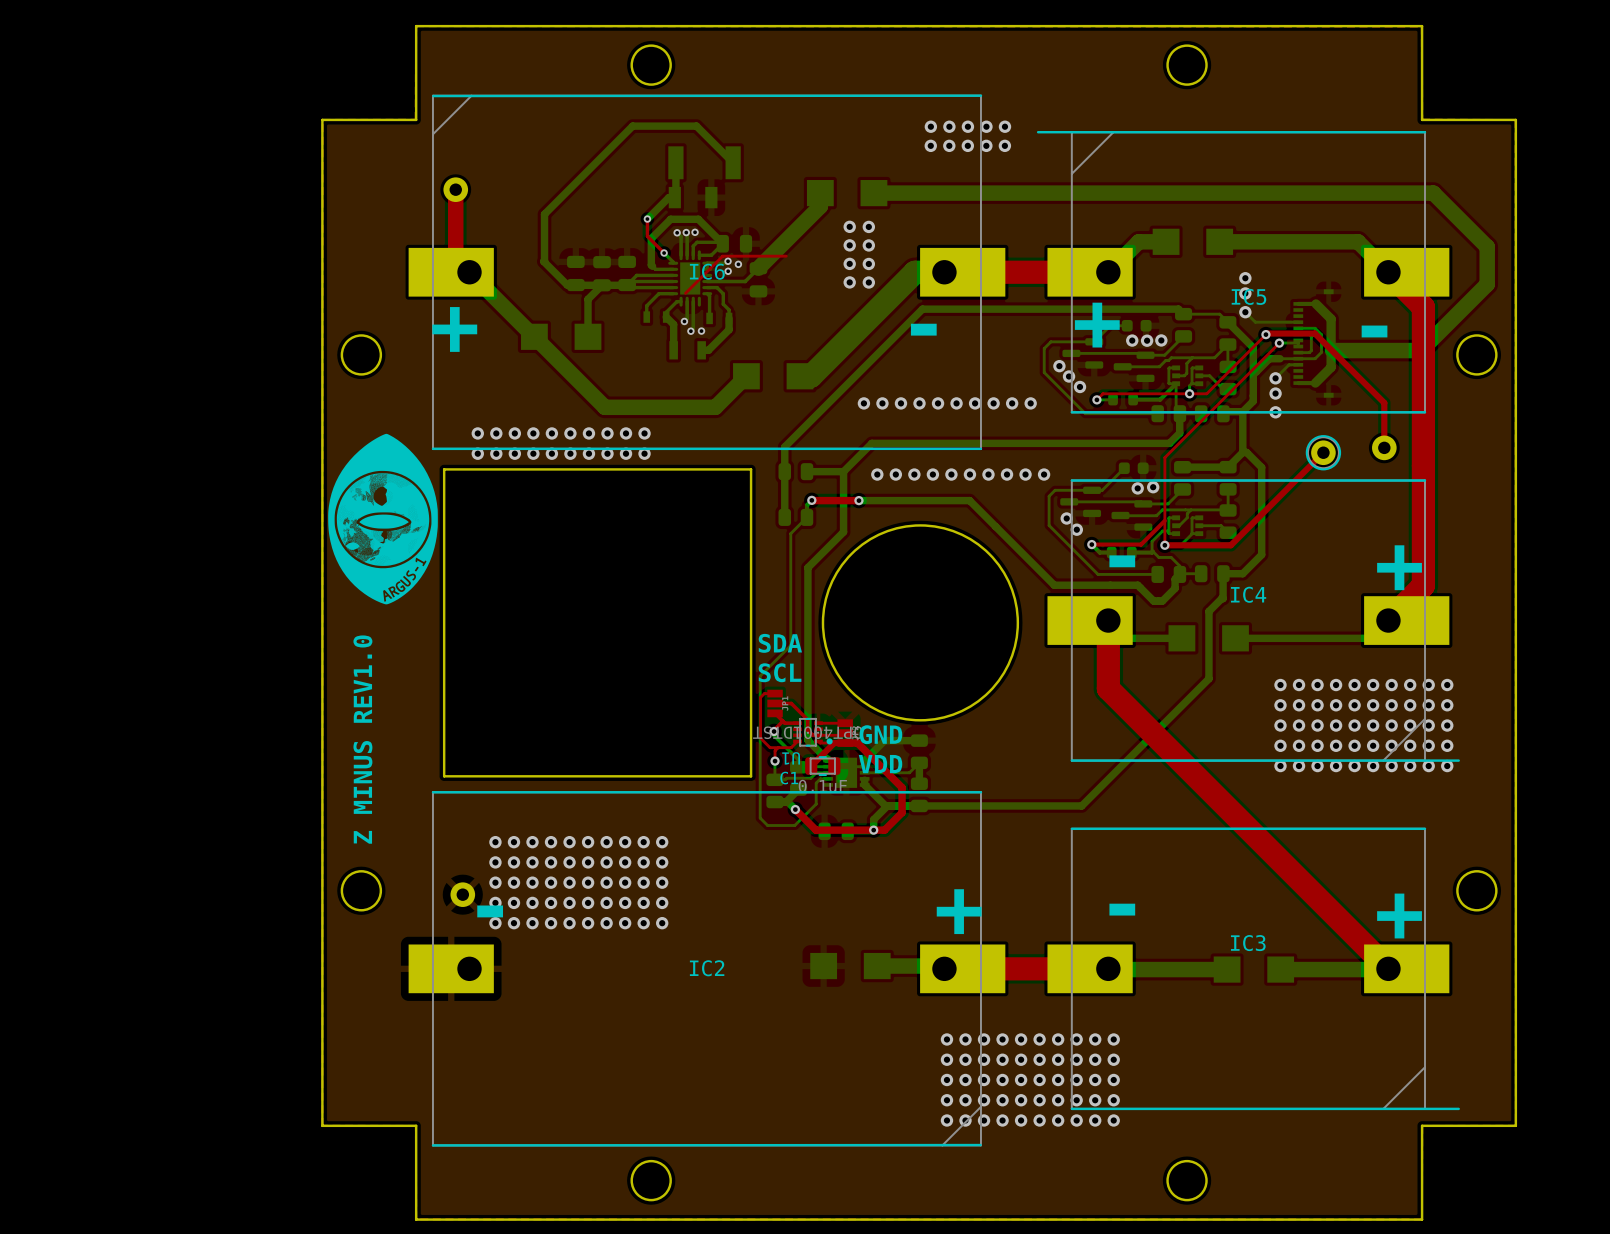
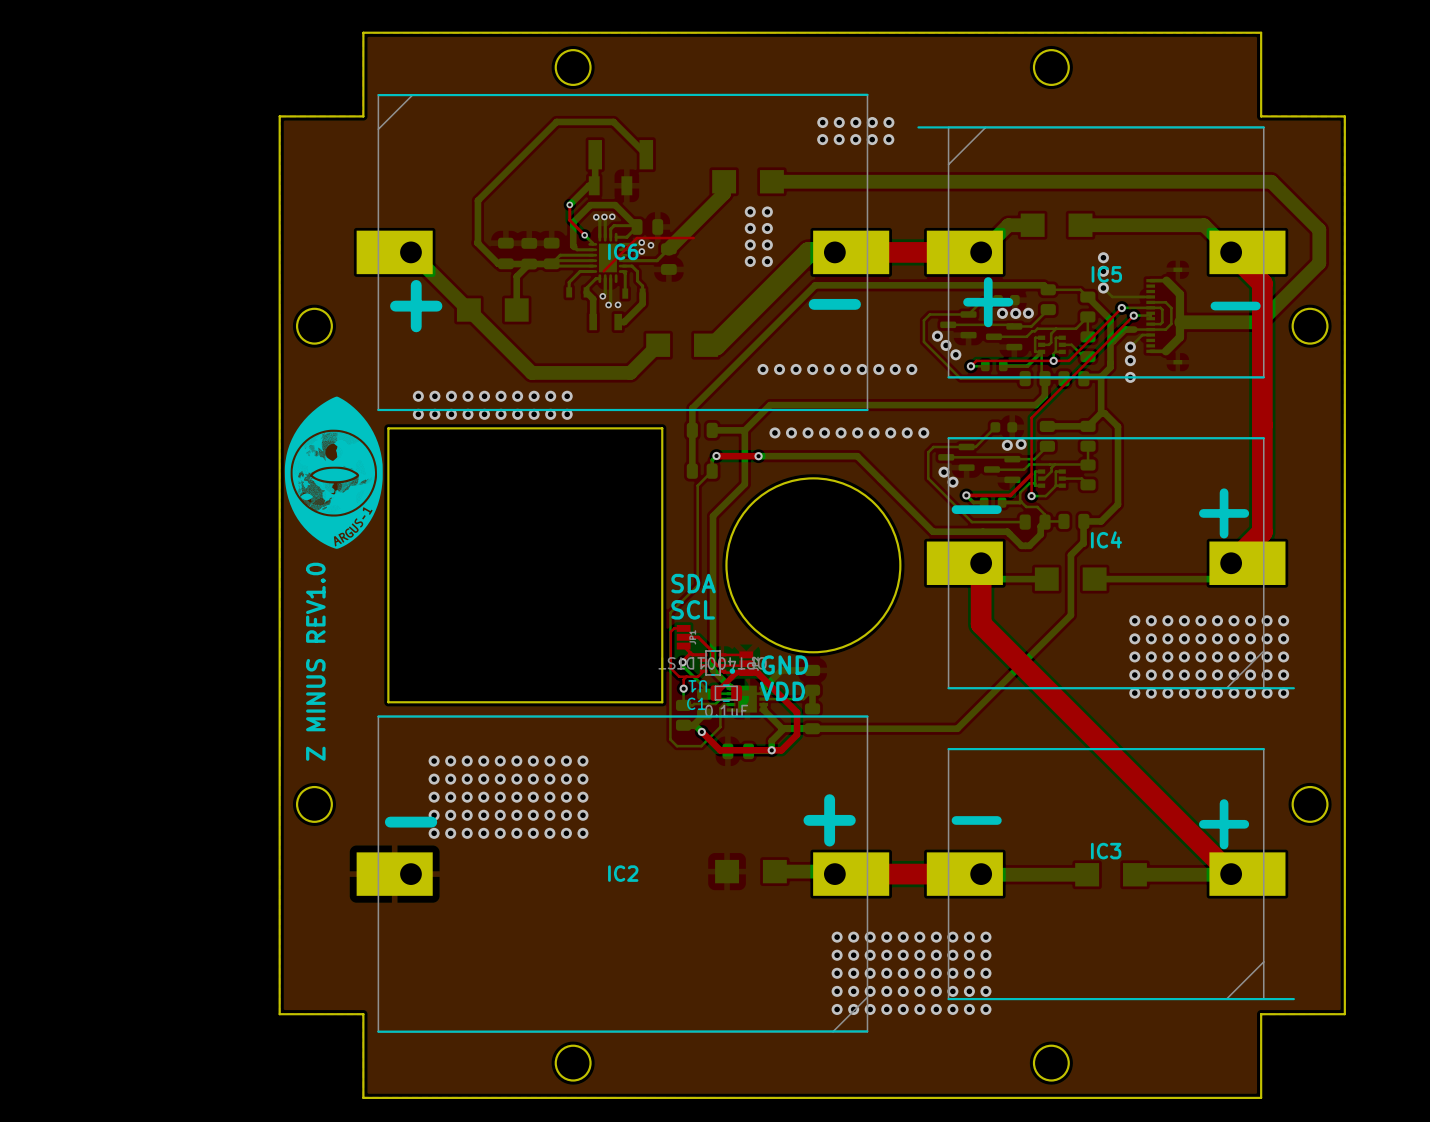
top track: (455, 189) (455, 258) (469, 272) -> none
part: (455, 189) -> none
top track: (1265, 334) (1314, 333) (1384, 402) (1384, 447) -> none
part: (1384, 447) -> none
top track: (1323, 452) (1230, 545) (1164, 545) -> none
part: (1323, 452) -> none
part: (462, 894) -> none

